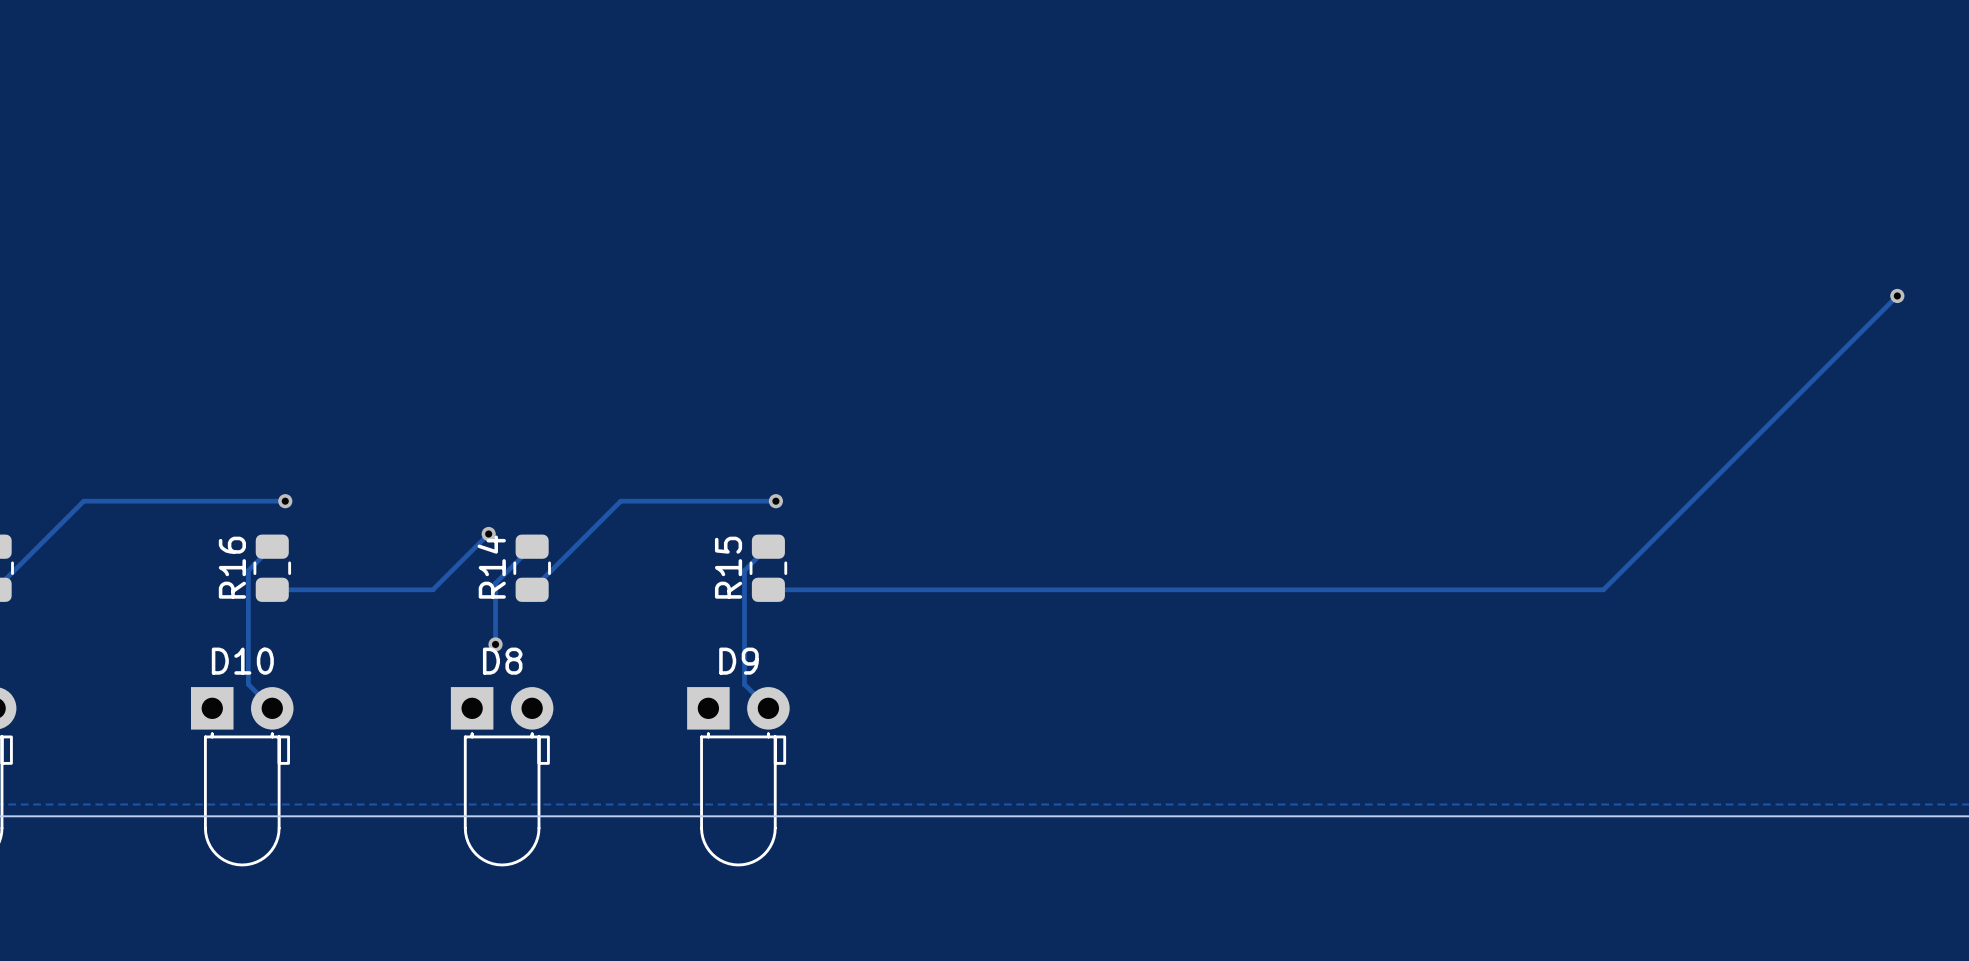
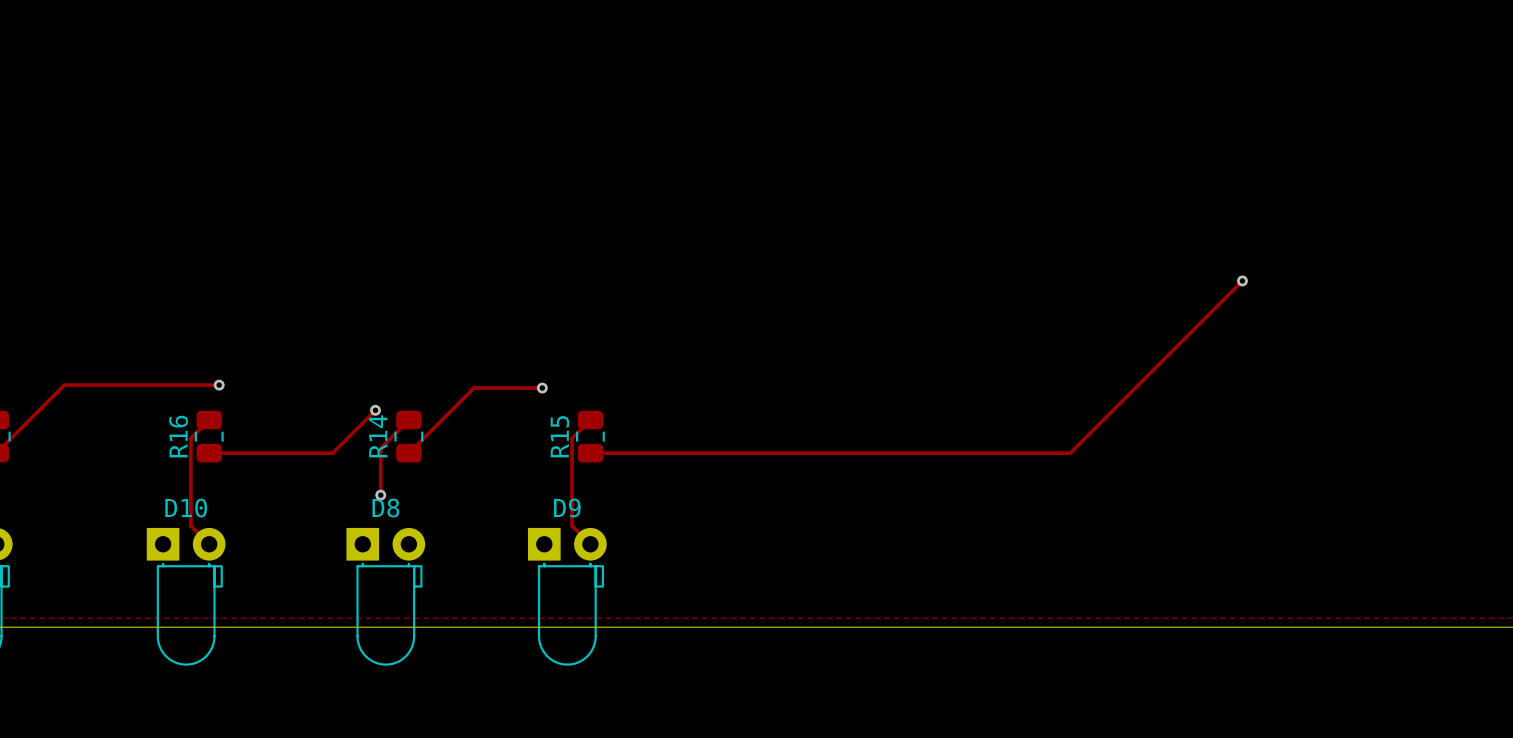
track: (1897, 295) (1603, 589) (1392, 589) -> (1242, 280) (1070, 453)
via: (1897, 295) -> none
via: none -> (1242, 280)
track: (775, 501) (620, 501) (616, 505) -> (542, 388) (474, 388)
via position: (775, 501) -> (542, 388)

